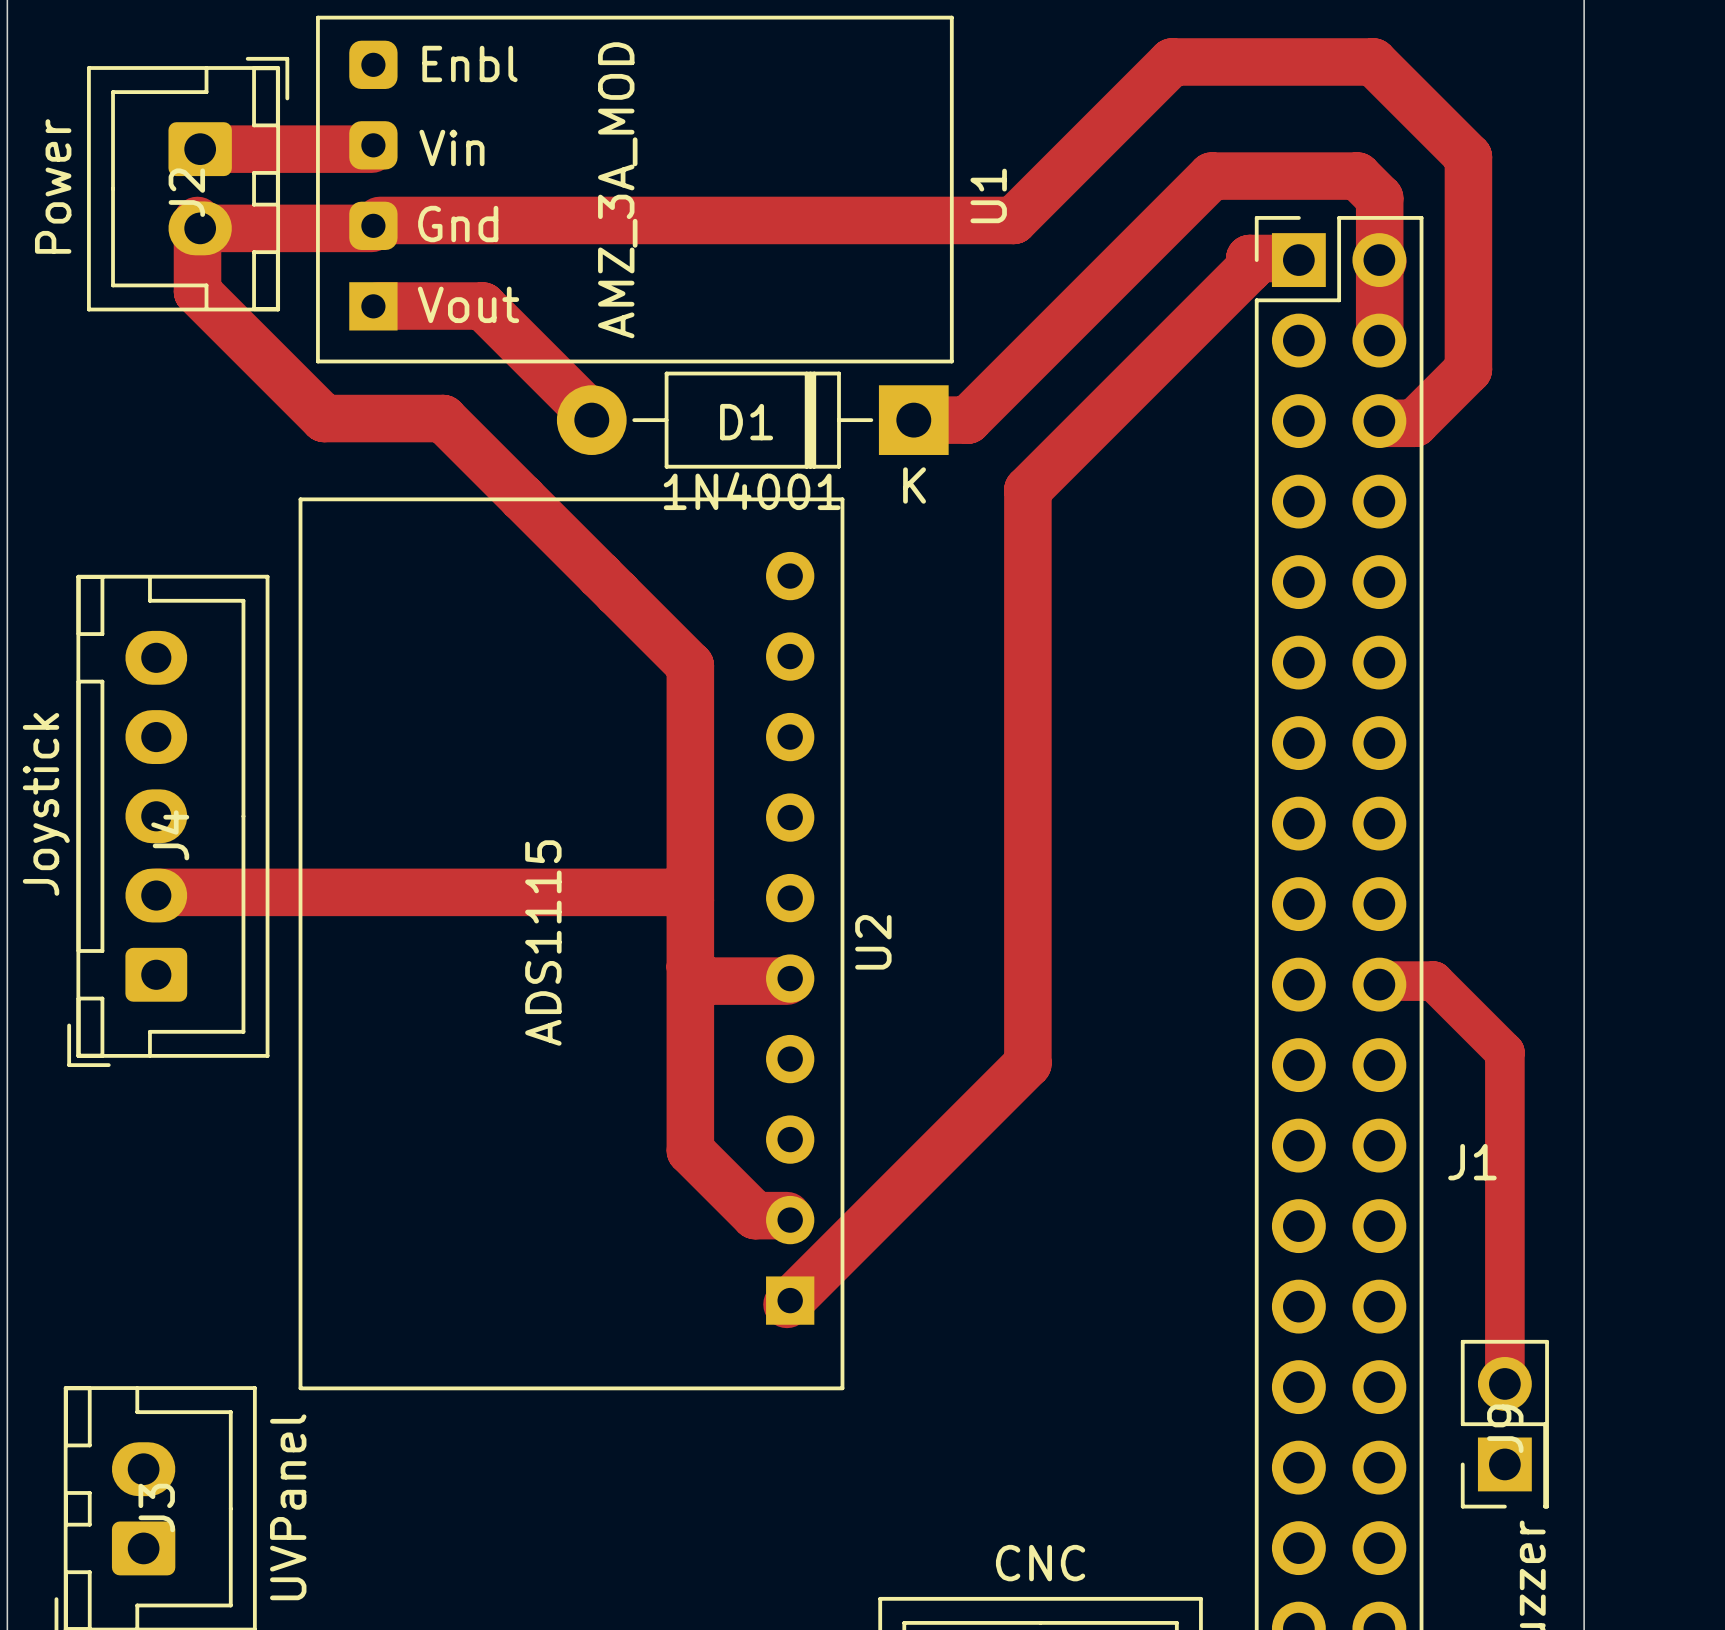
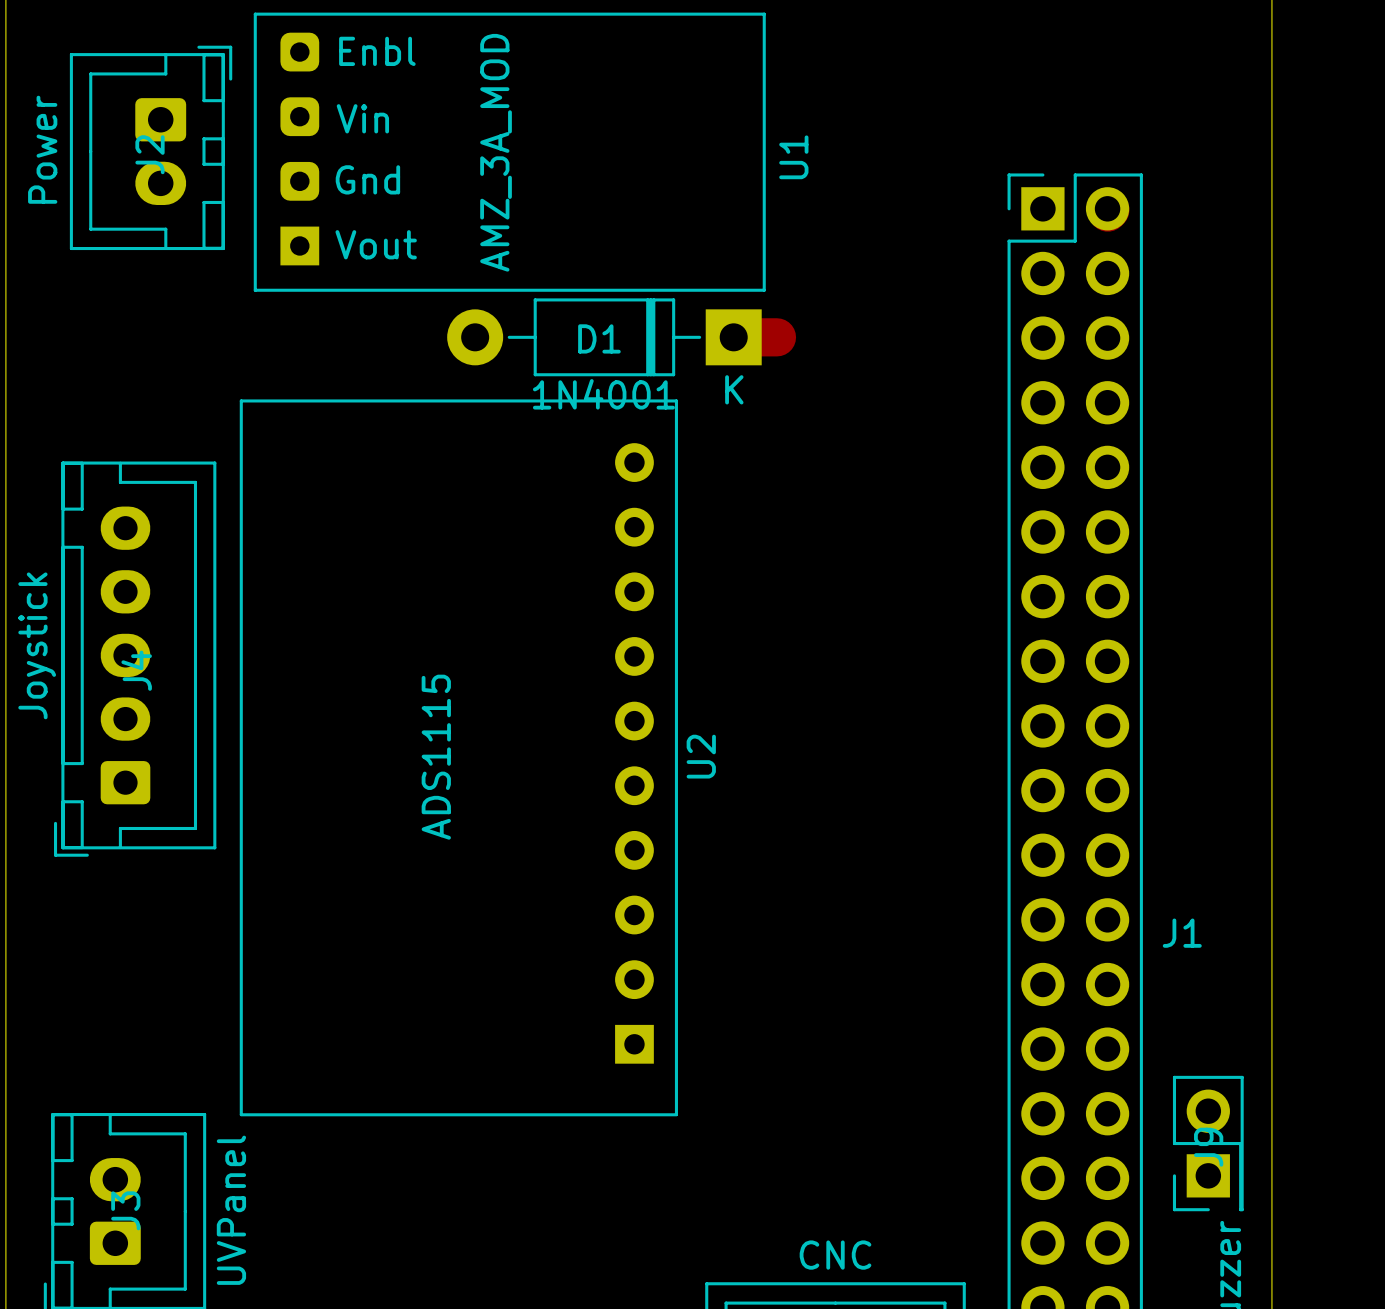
track: (205, 149) (371, 149) -> none
track: (197, 220) (197, 291) (324, 418) (443, 418) (690, 665) (690, 1150) (755, 1215) (787, 1215) -> none
track: (379, 220) (1013, 220) (1172, 61) (1373, 61) (1468, 157) (1468, 369) (1414, 423) (1382, 423) -> none
track: (197, 228) (371, 228) -> none
track: (1297, 258) (1249, 258) (1249, 267) (1027, 489) (1027, 1063) (787, 1304) -> none
track: (378, 306) (482, 306) (593, 416) -> none
track: (1379, 340) (1379, 198) (1357, 176) (1211, 176) (967, 420) -> none
track: (156, 892) (682, 892) (690, 900) -> none
track: (690, 966) (704, 981) (787, 981) -> none
track: (1386, 981) (1433, 981) (1504, 1052) (1504, 1385) -> none

